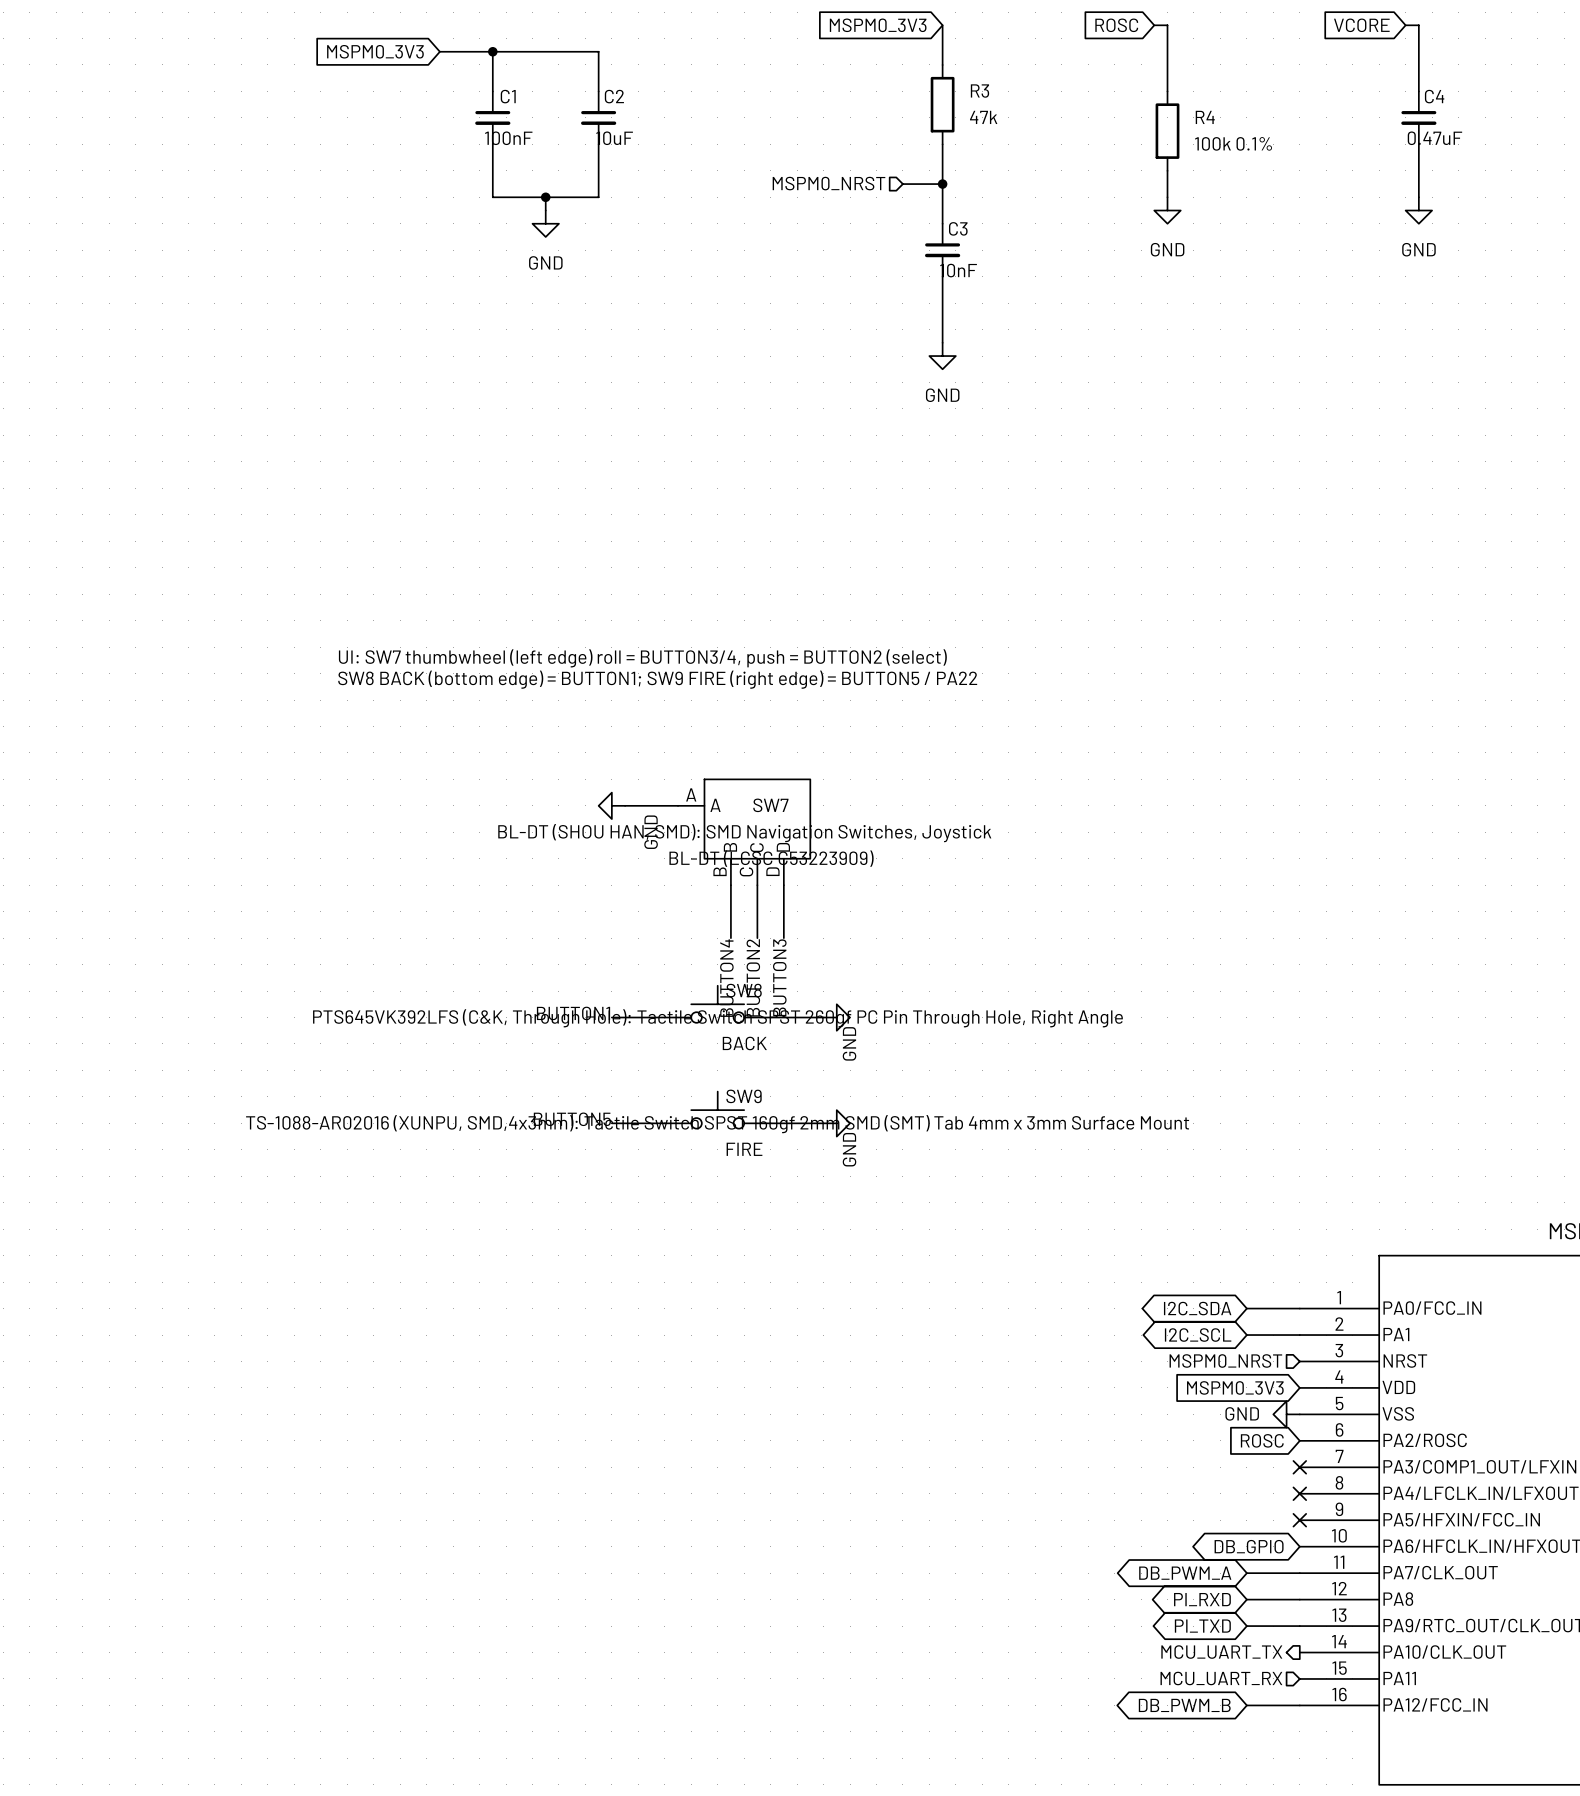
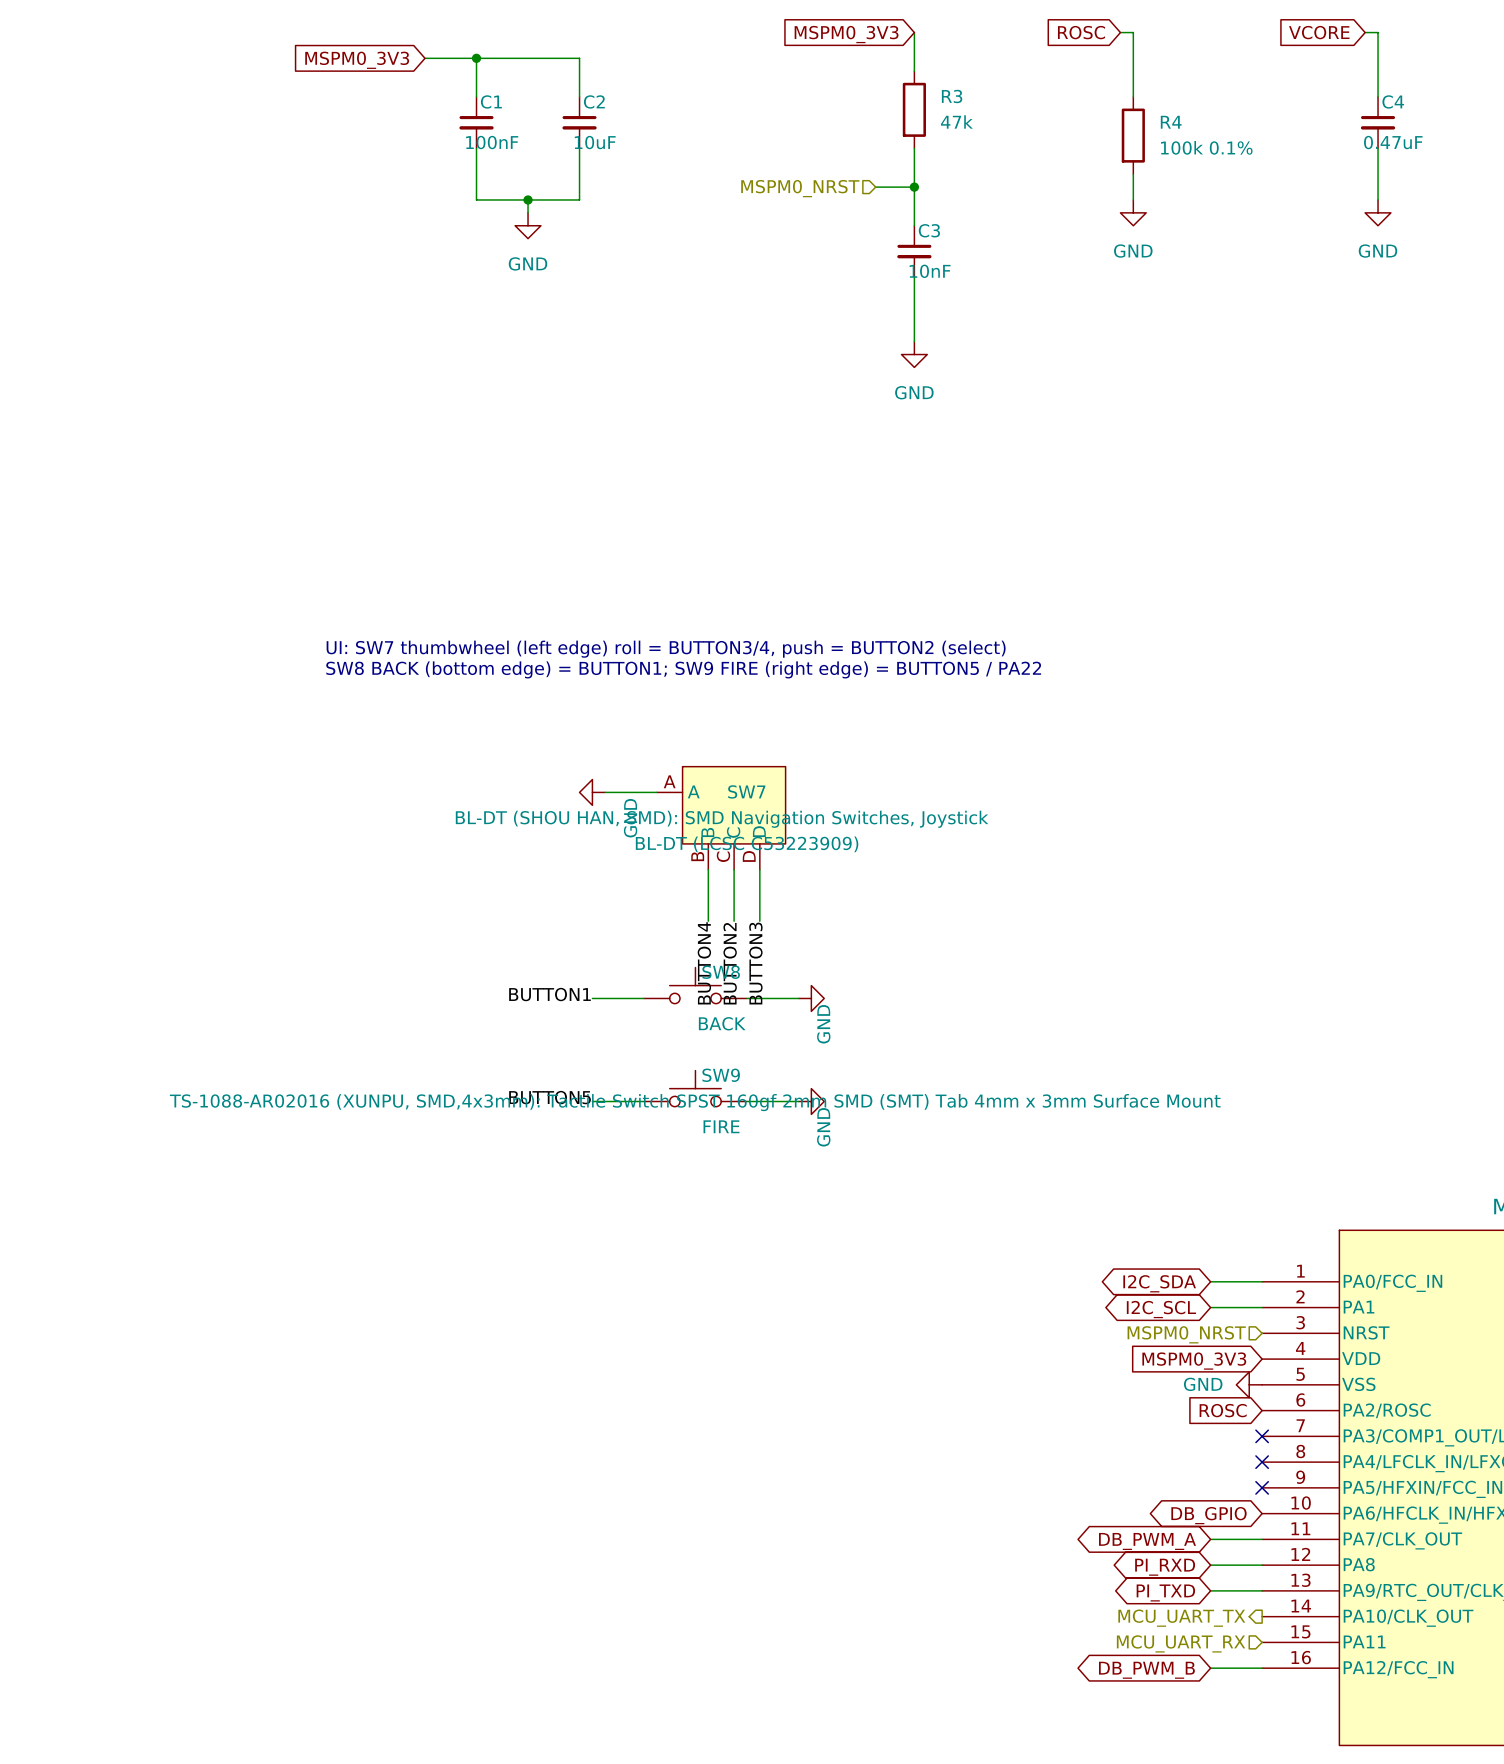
SW8 text: PTS645VK392LFS (C&K, Through Hole): Tactile Switch SPST 260gf PC Pin Through Hole, Right Angle (717, 1018) -> none

